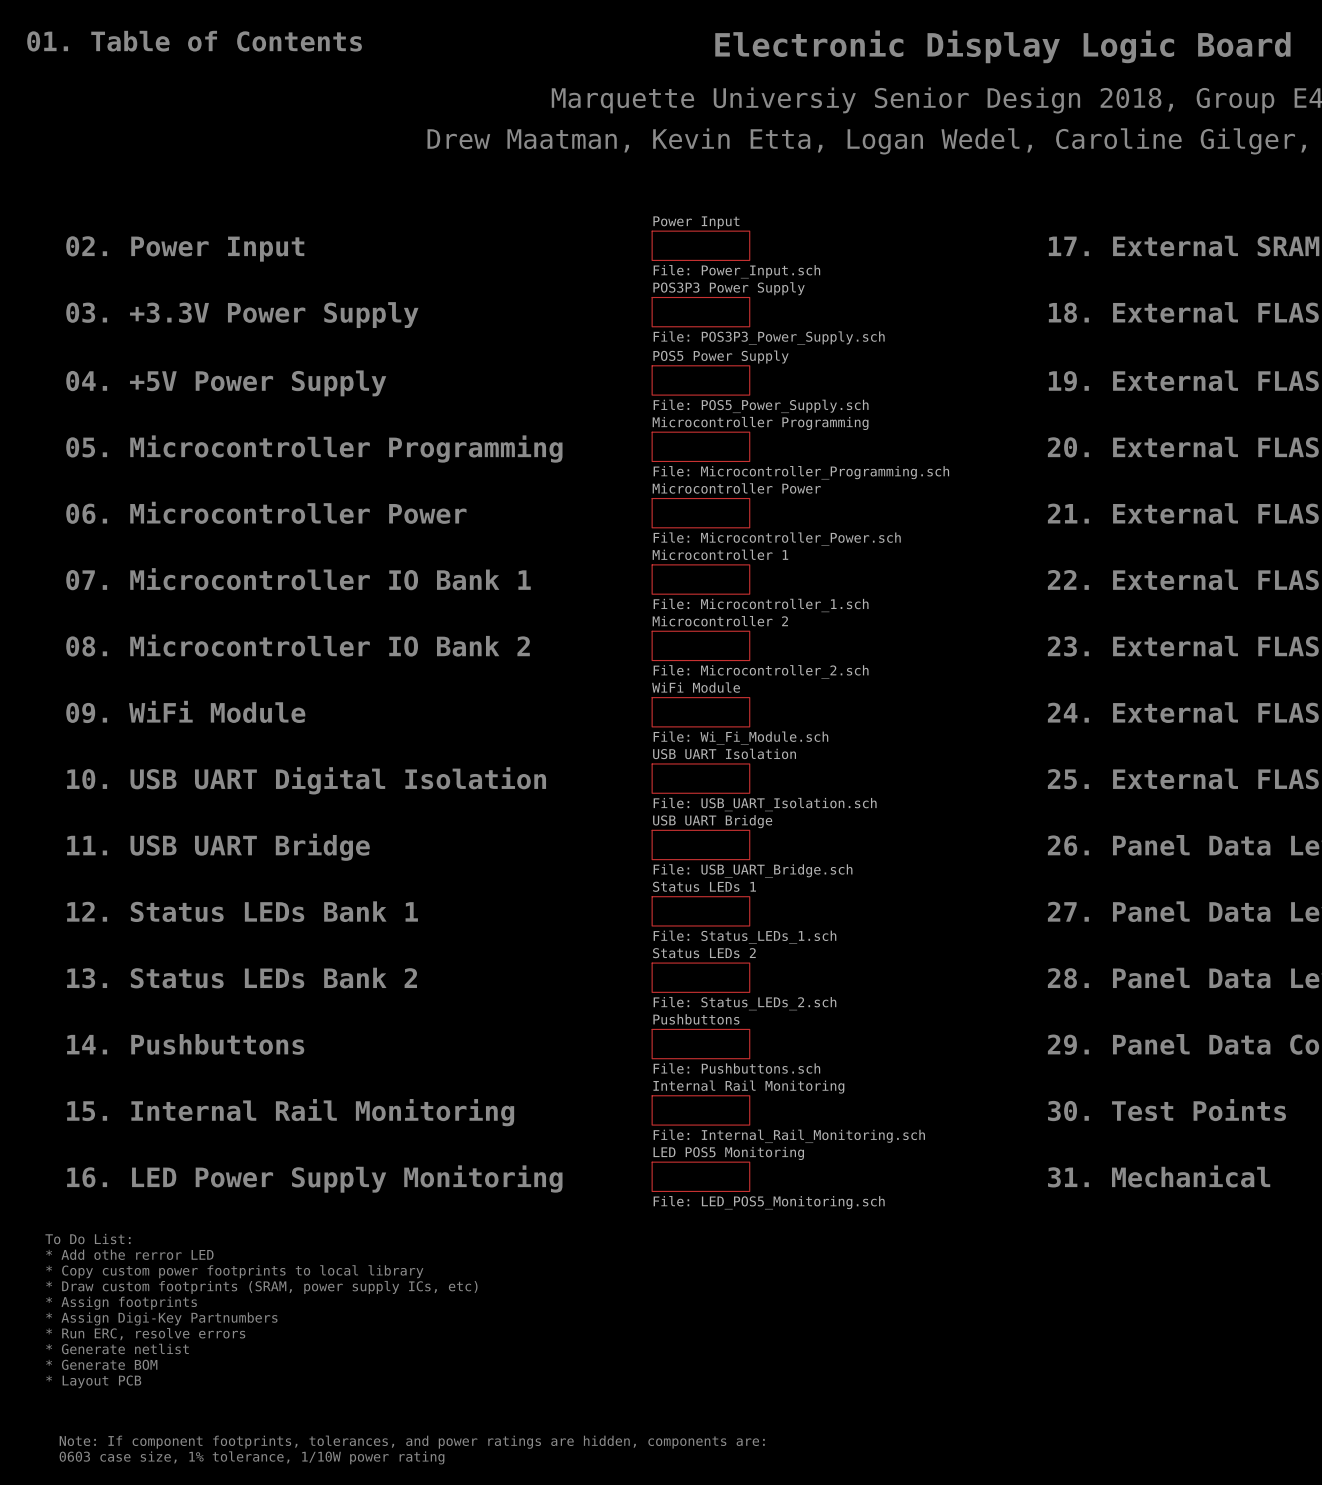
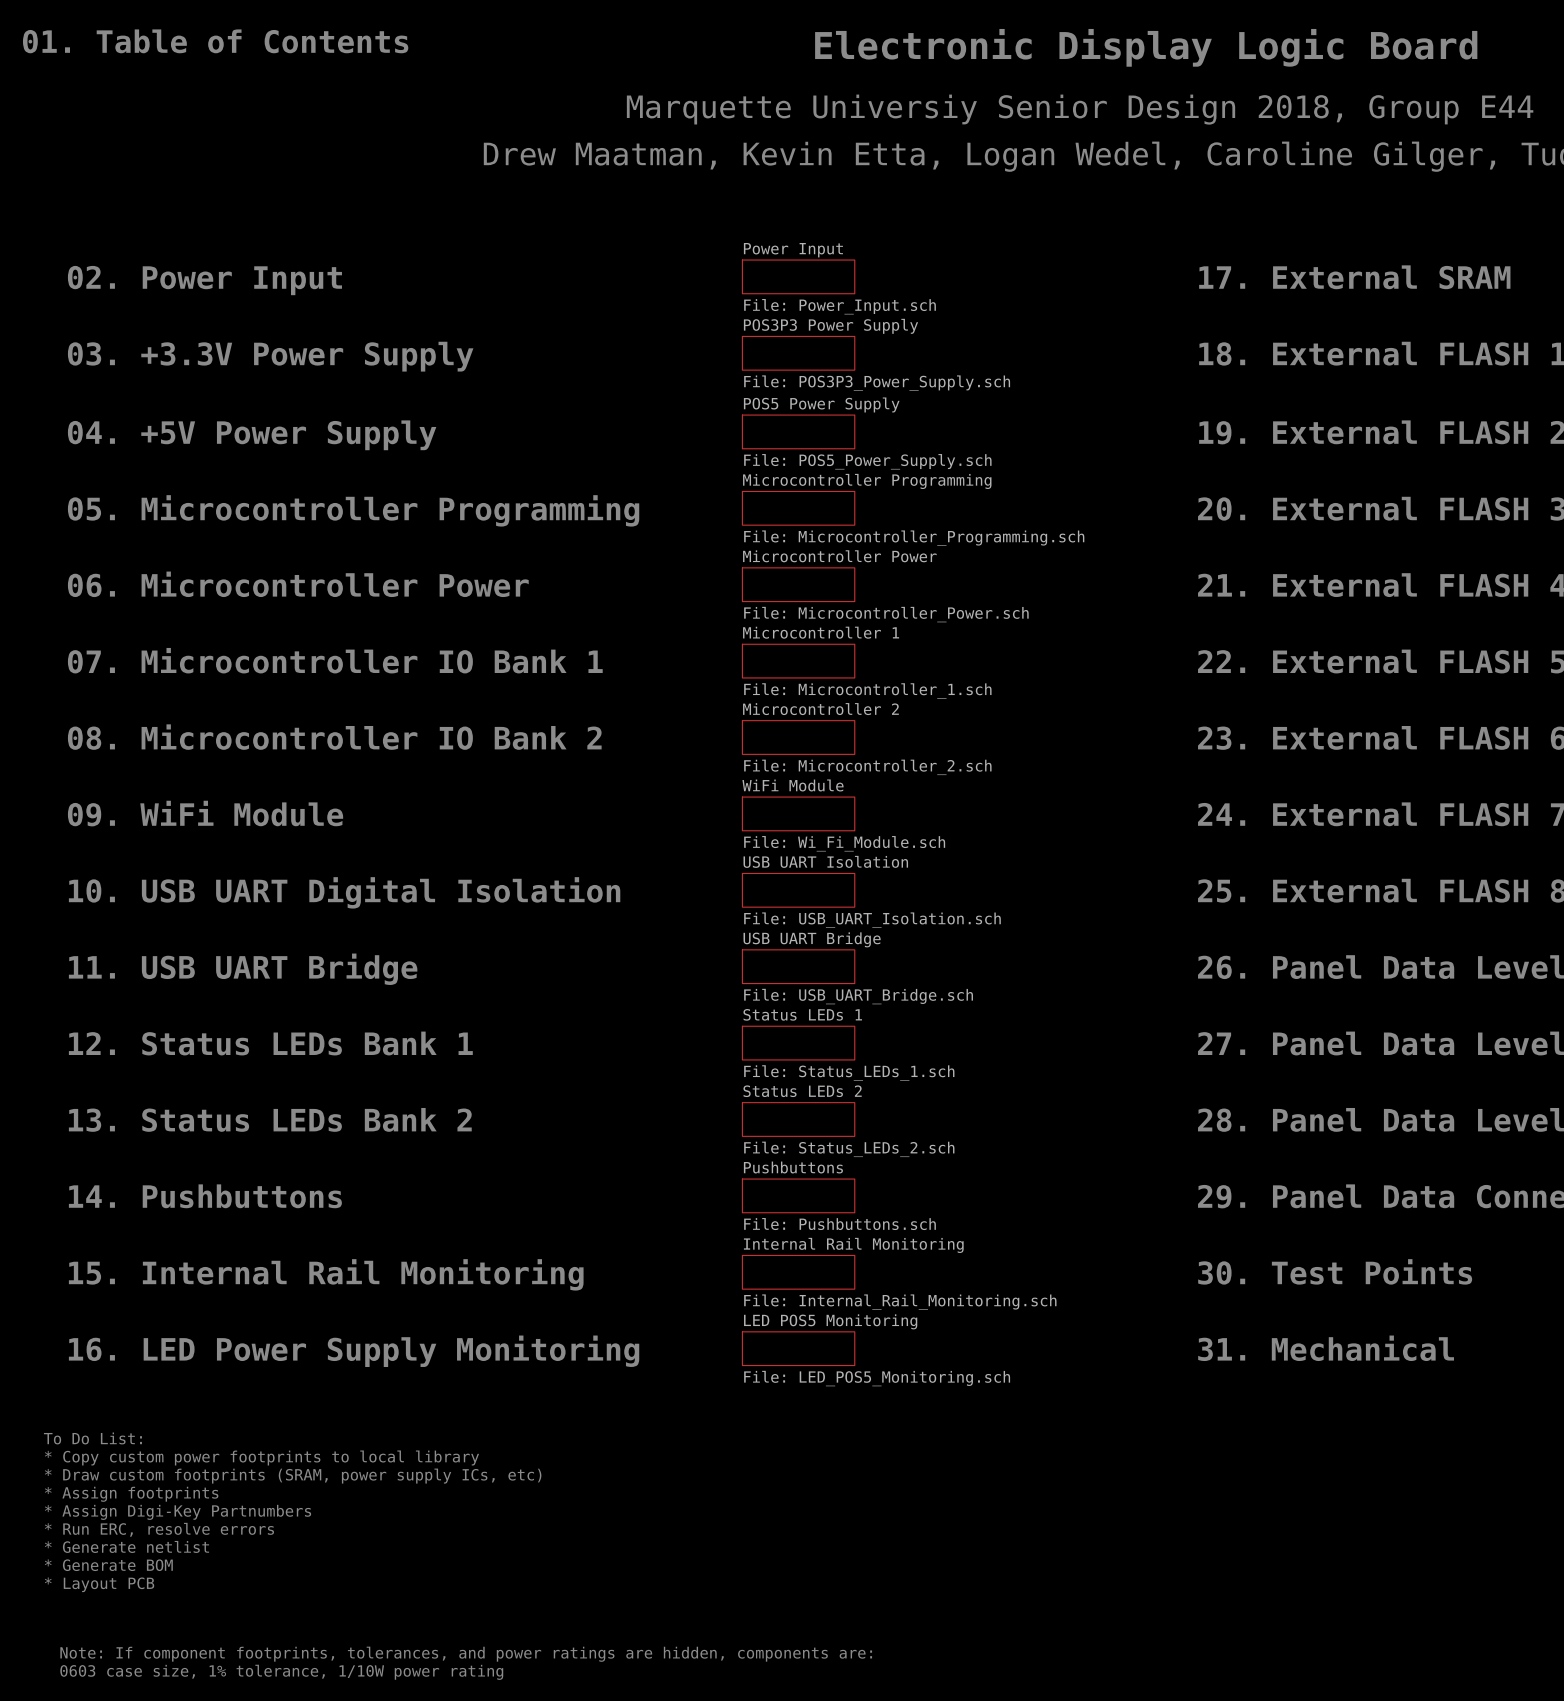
text: To Do List: (87, 1239) -> none
text: * Add othe rerror LED (129, 1254) -> To Do List: (92, 1438)

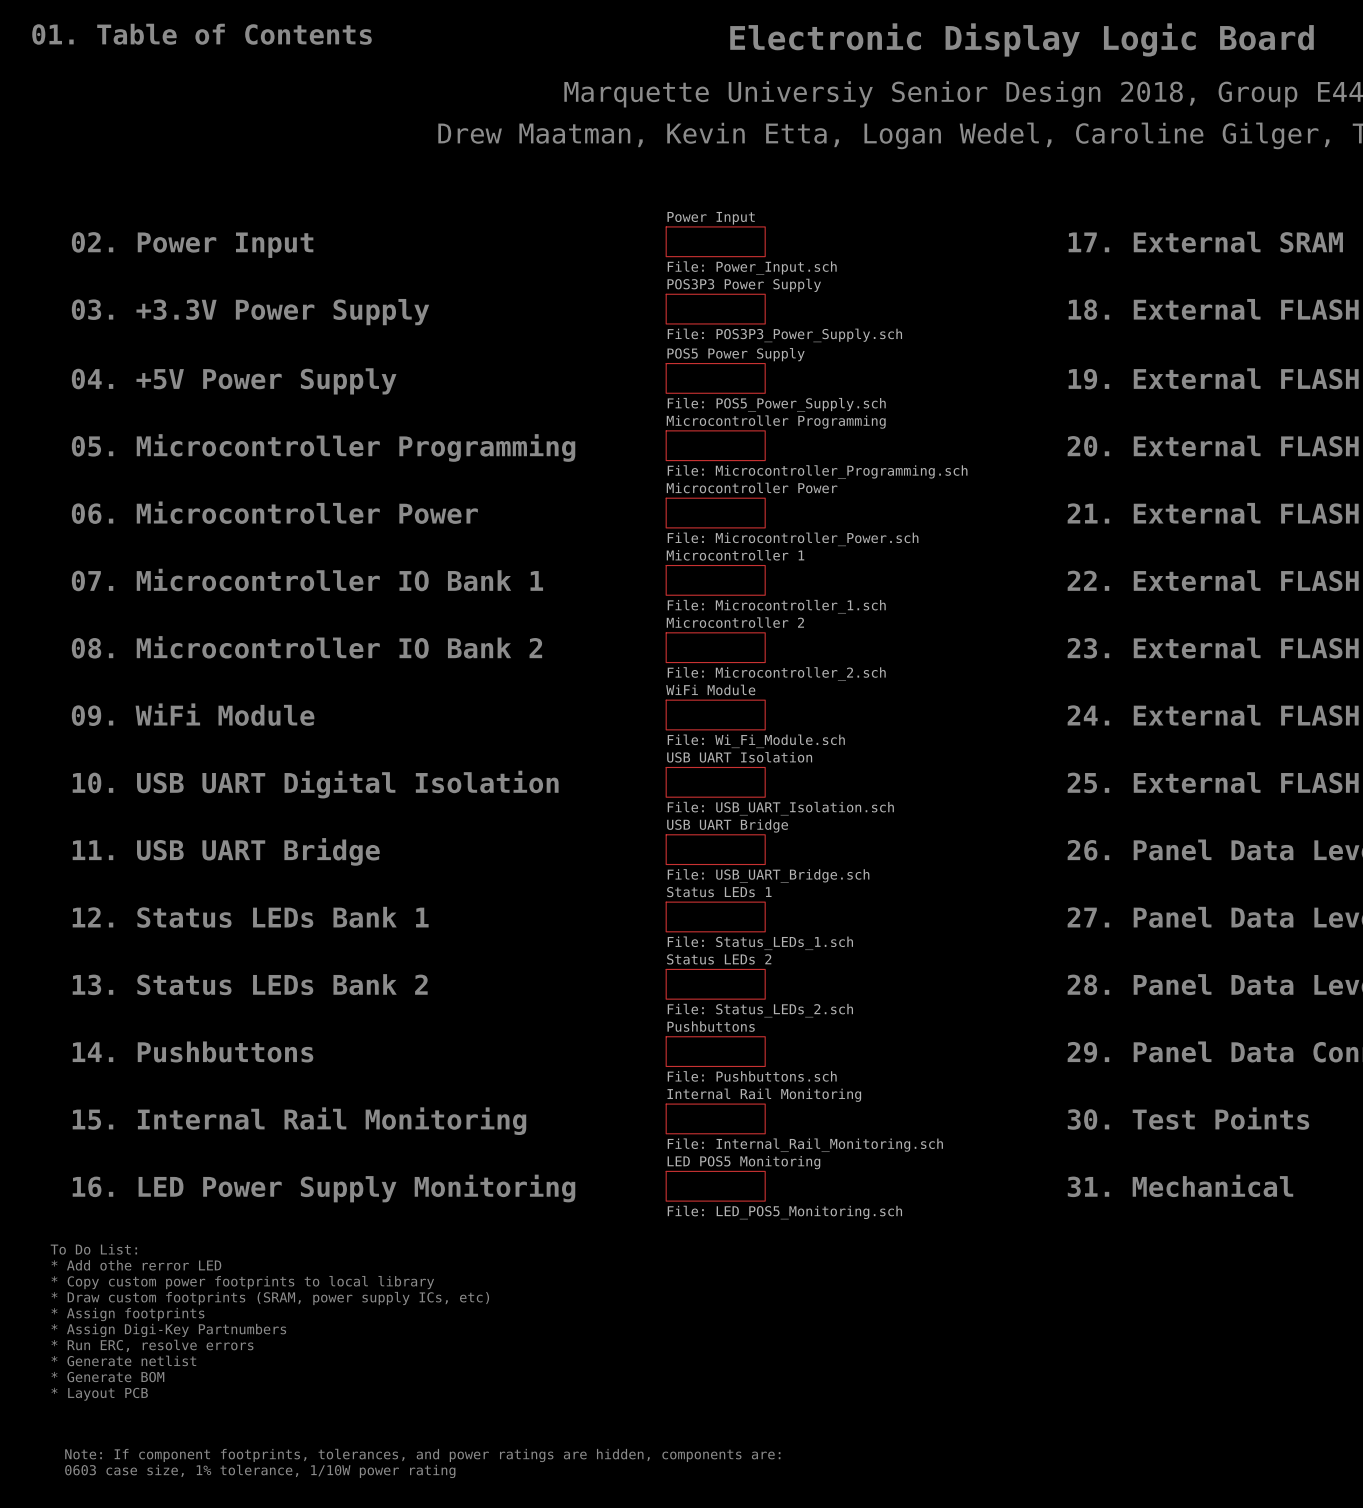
text: none -> To Do List: (93, 1249)
text: To Do List: (92, 1438) -> * Add othe rerror LED (136, 1265)

